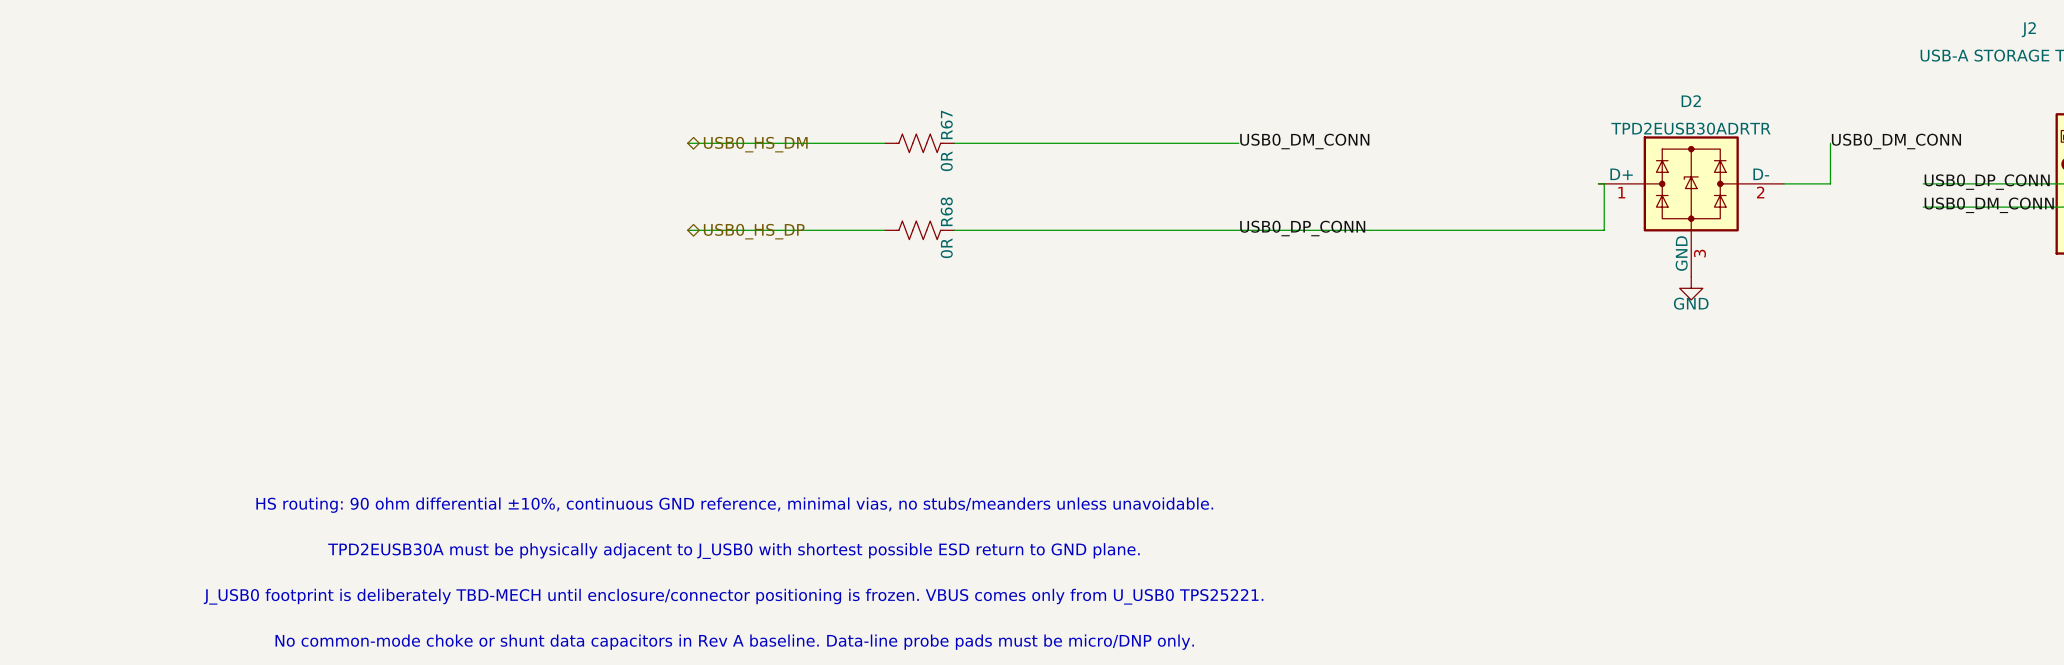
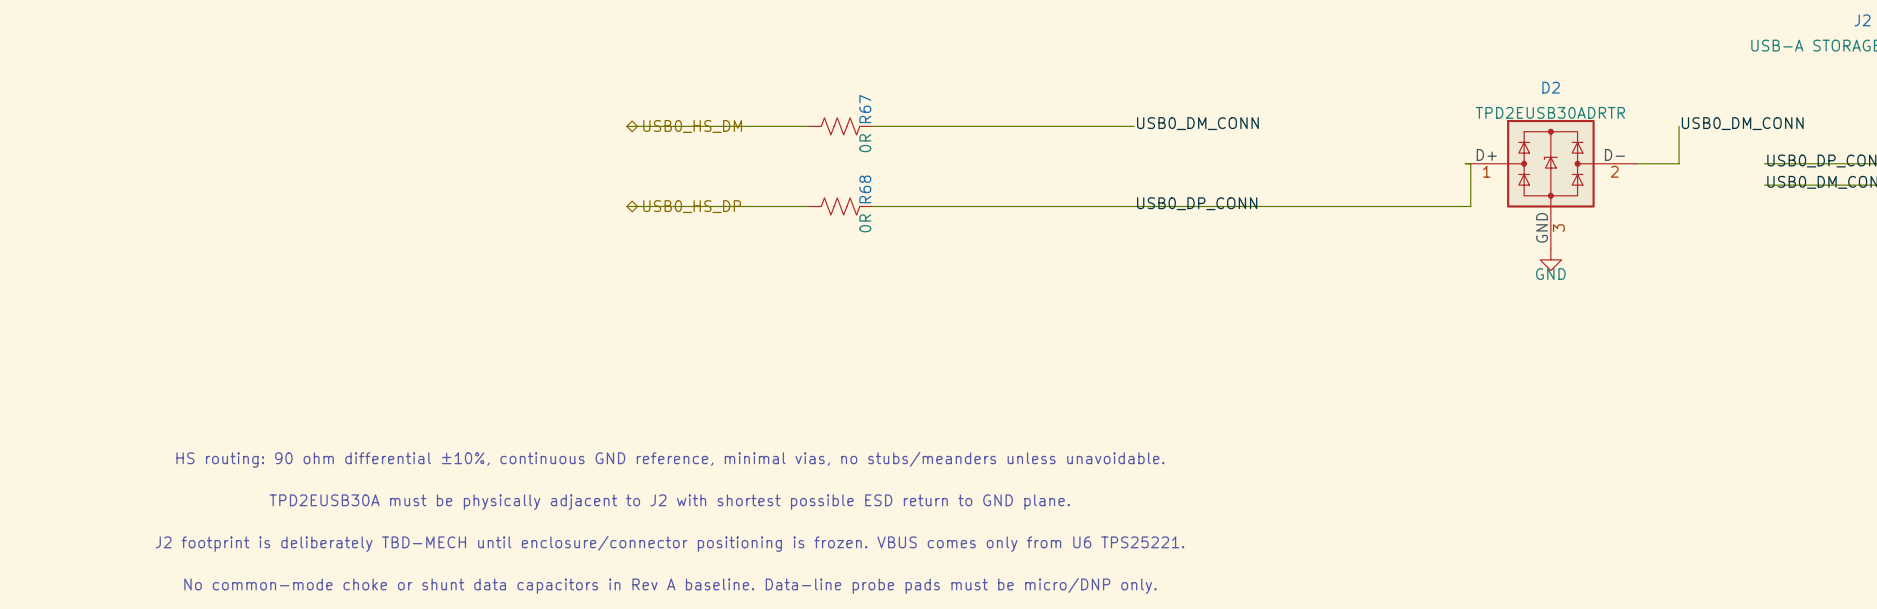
text: TPD2EUSB30A must be physically adjacent to J_USB0 with shortest possible ESD return to GND plane. (733, 551) -> TPD2EUSB30A must be physically adjacent to J2 with shortest possible ESD return to GND plane. (669, 502)
text: J_USB0 footprint is deliberately TBD-MECH until enclosure/connector positioning is frozen. VBUS comes only from U_USB0 TPS25221. (733, 596) -> J2 footprint is deliberately TBD-MECH until enclosure/connector positioning is frozen. VBUS comes only from U6 TPS25221. (669, 543)

